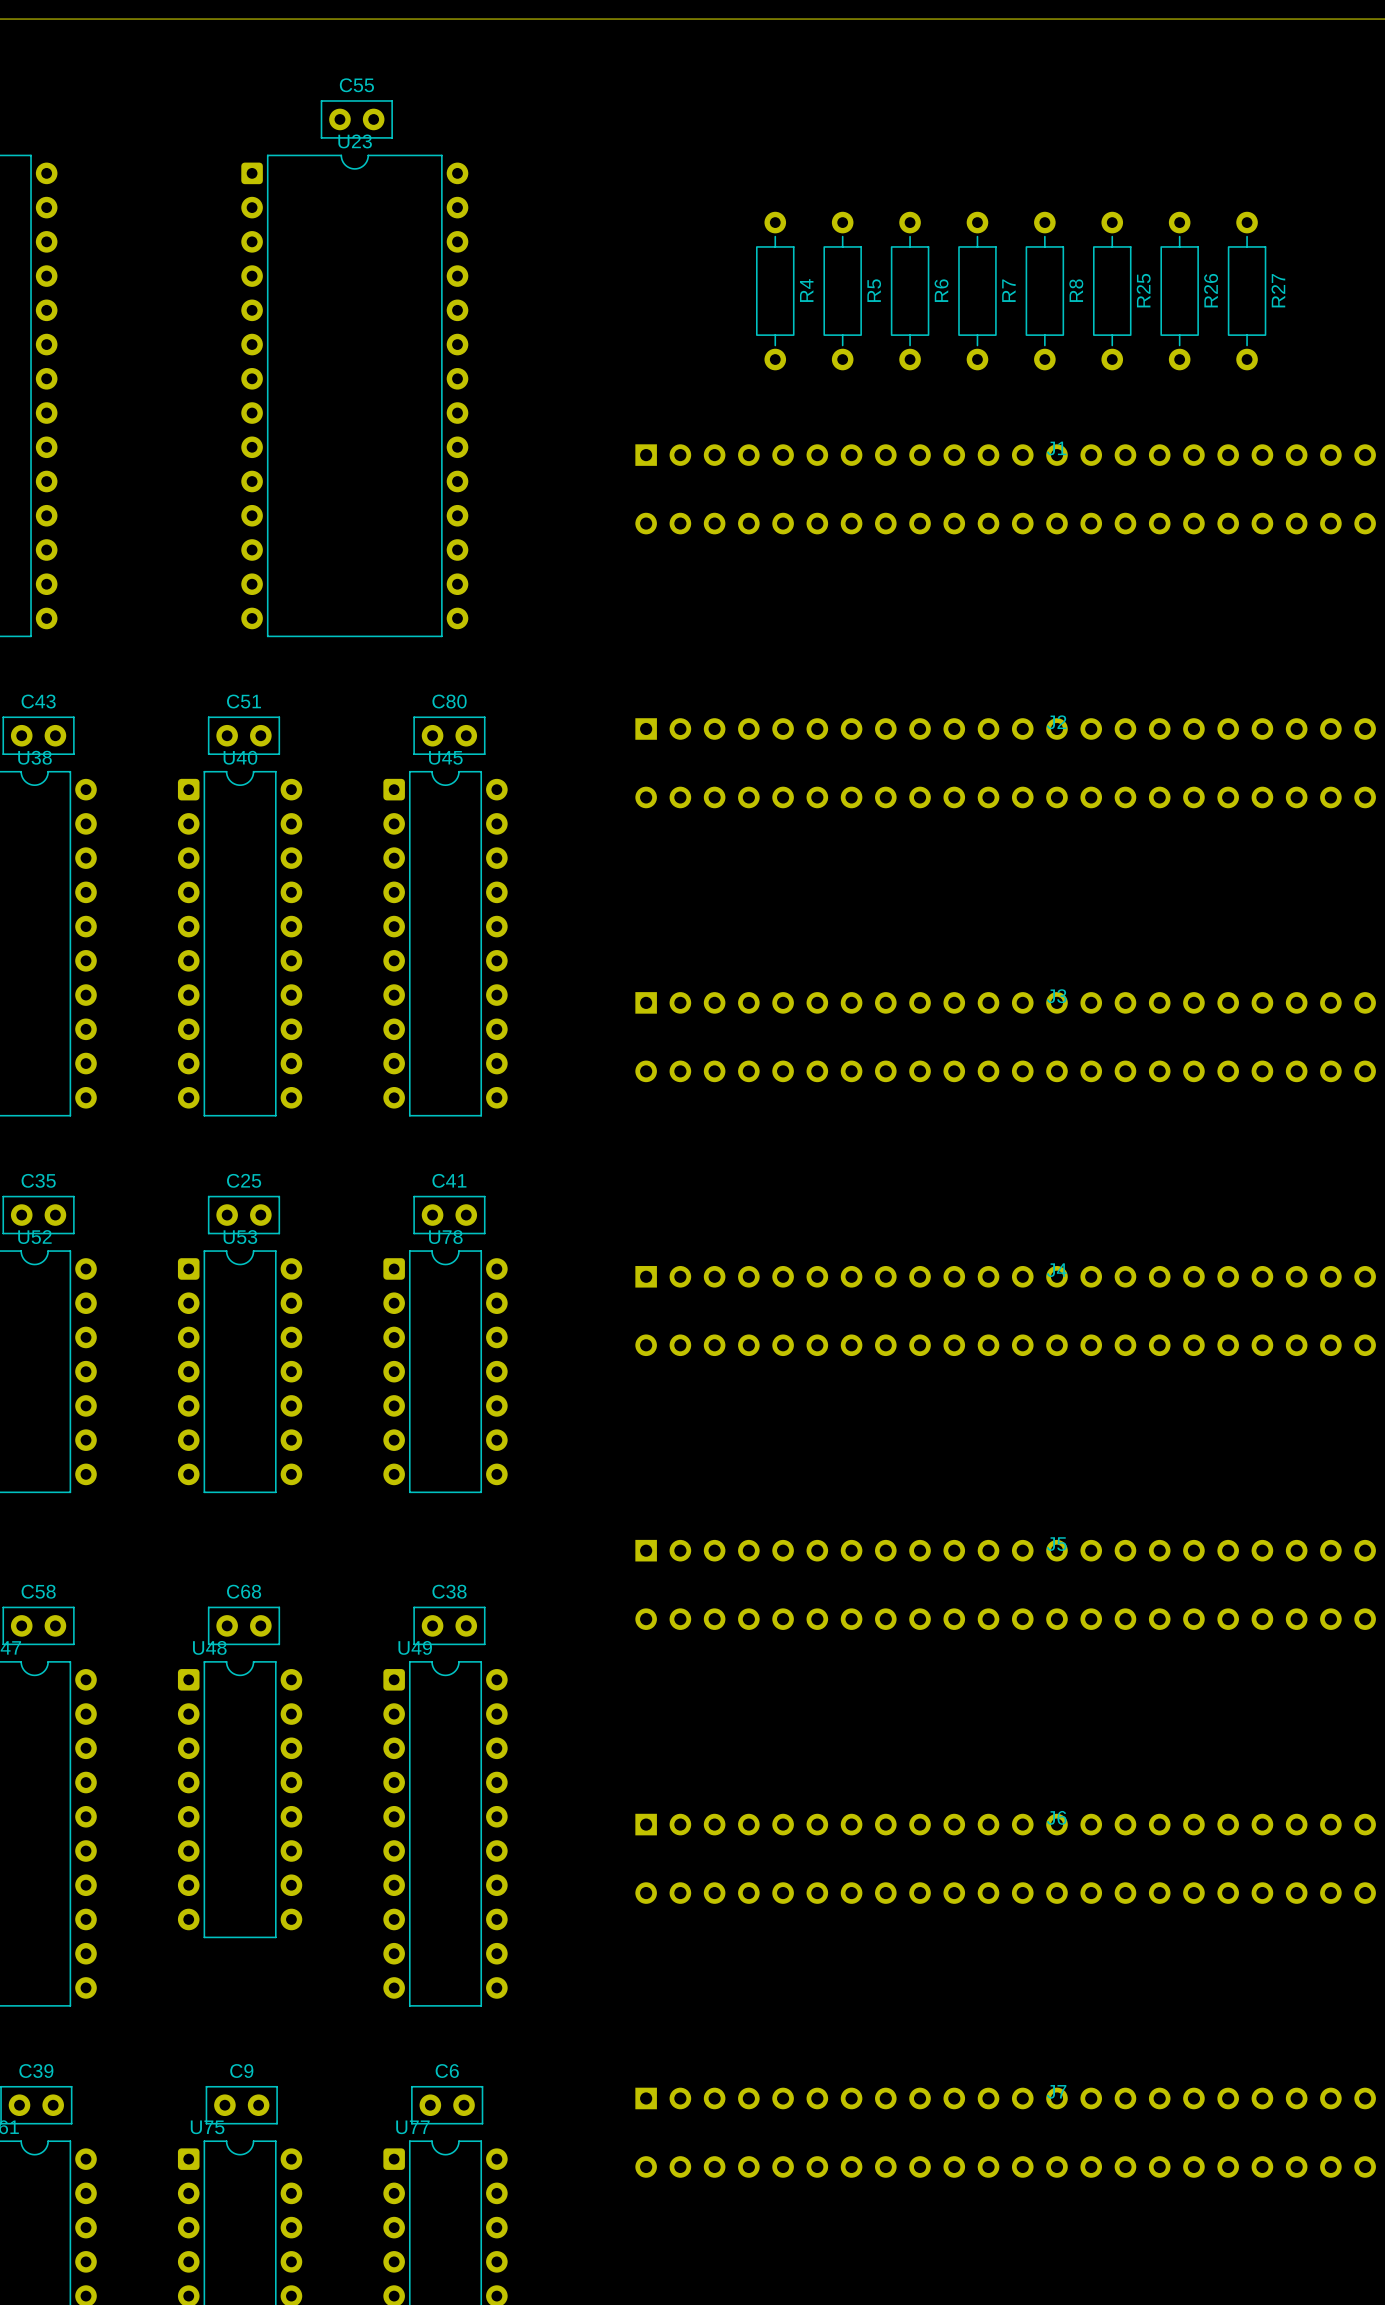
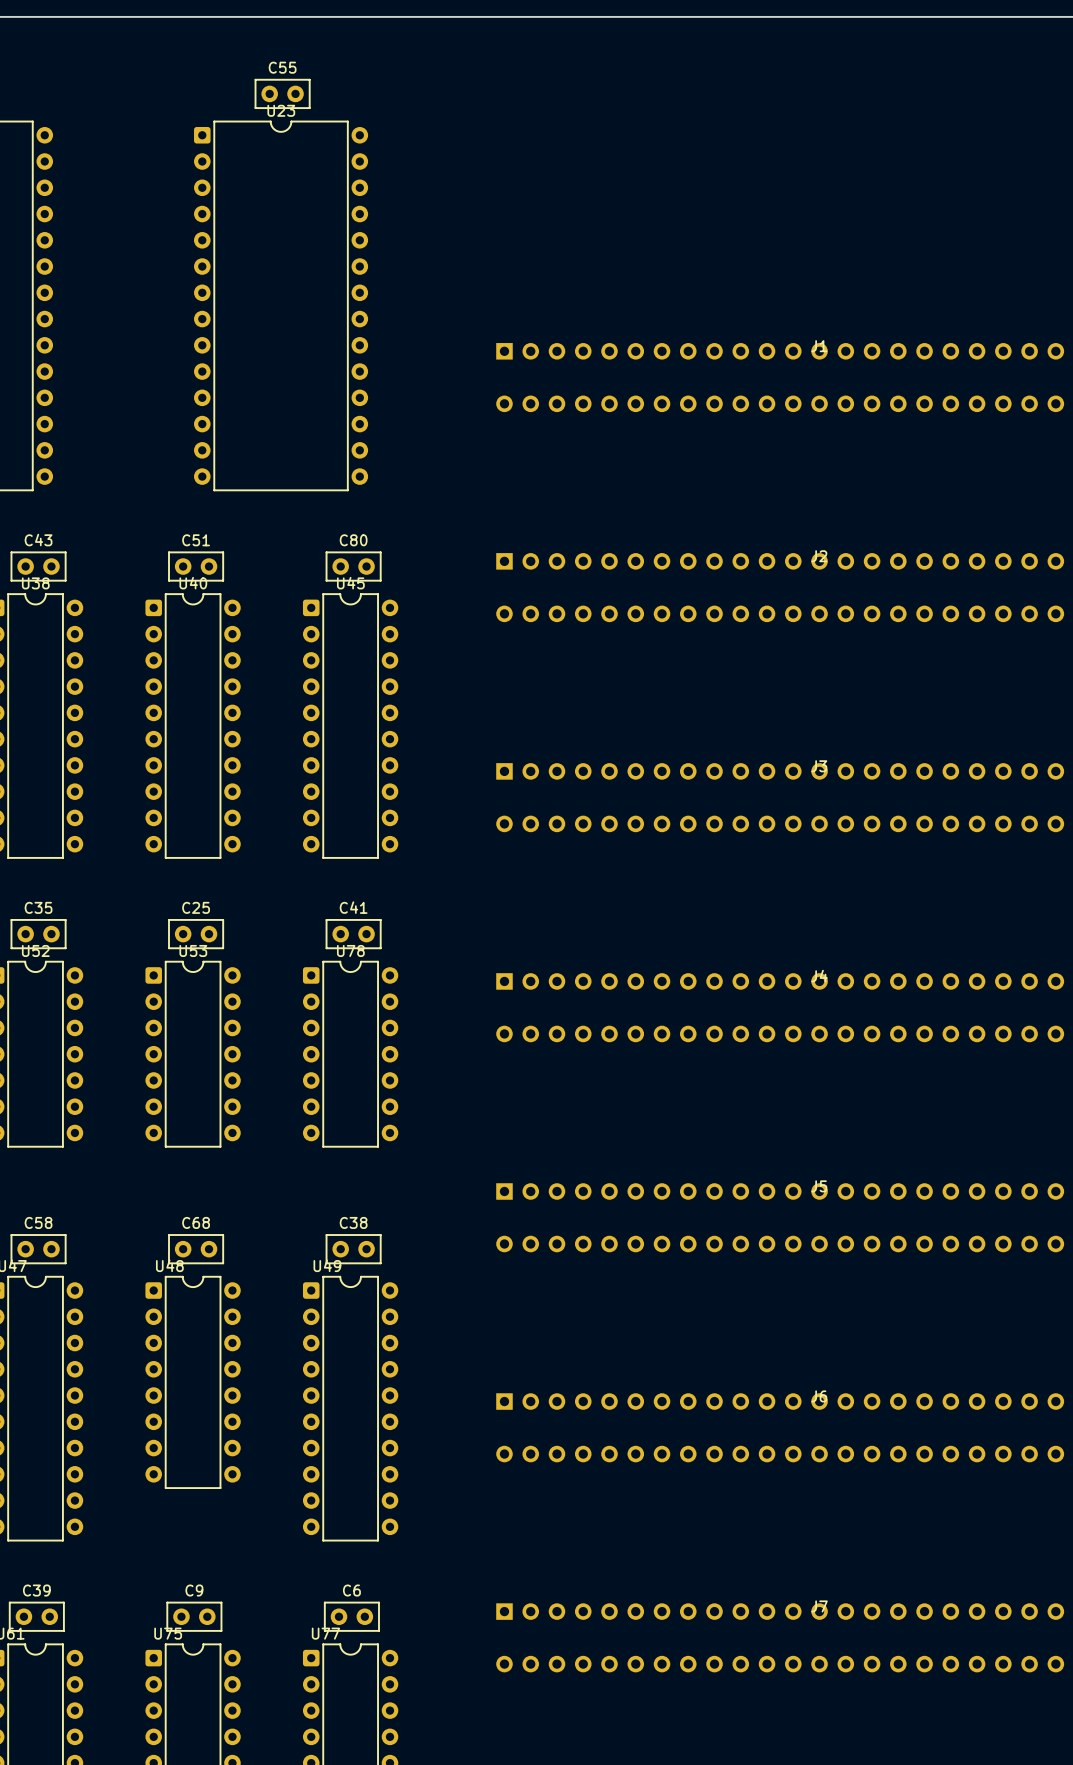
R4: (775, 291) -> none
R5: (842, 291) -> none
R6: (910, 291) -> none
R7: (977, 291) -> none
R8: (1044, 291) -> none
R25: (1112, 291) -> none
R26: (1179, 291) -> none
R27: (1247, 291) -> none

